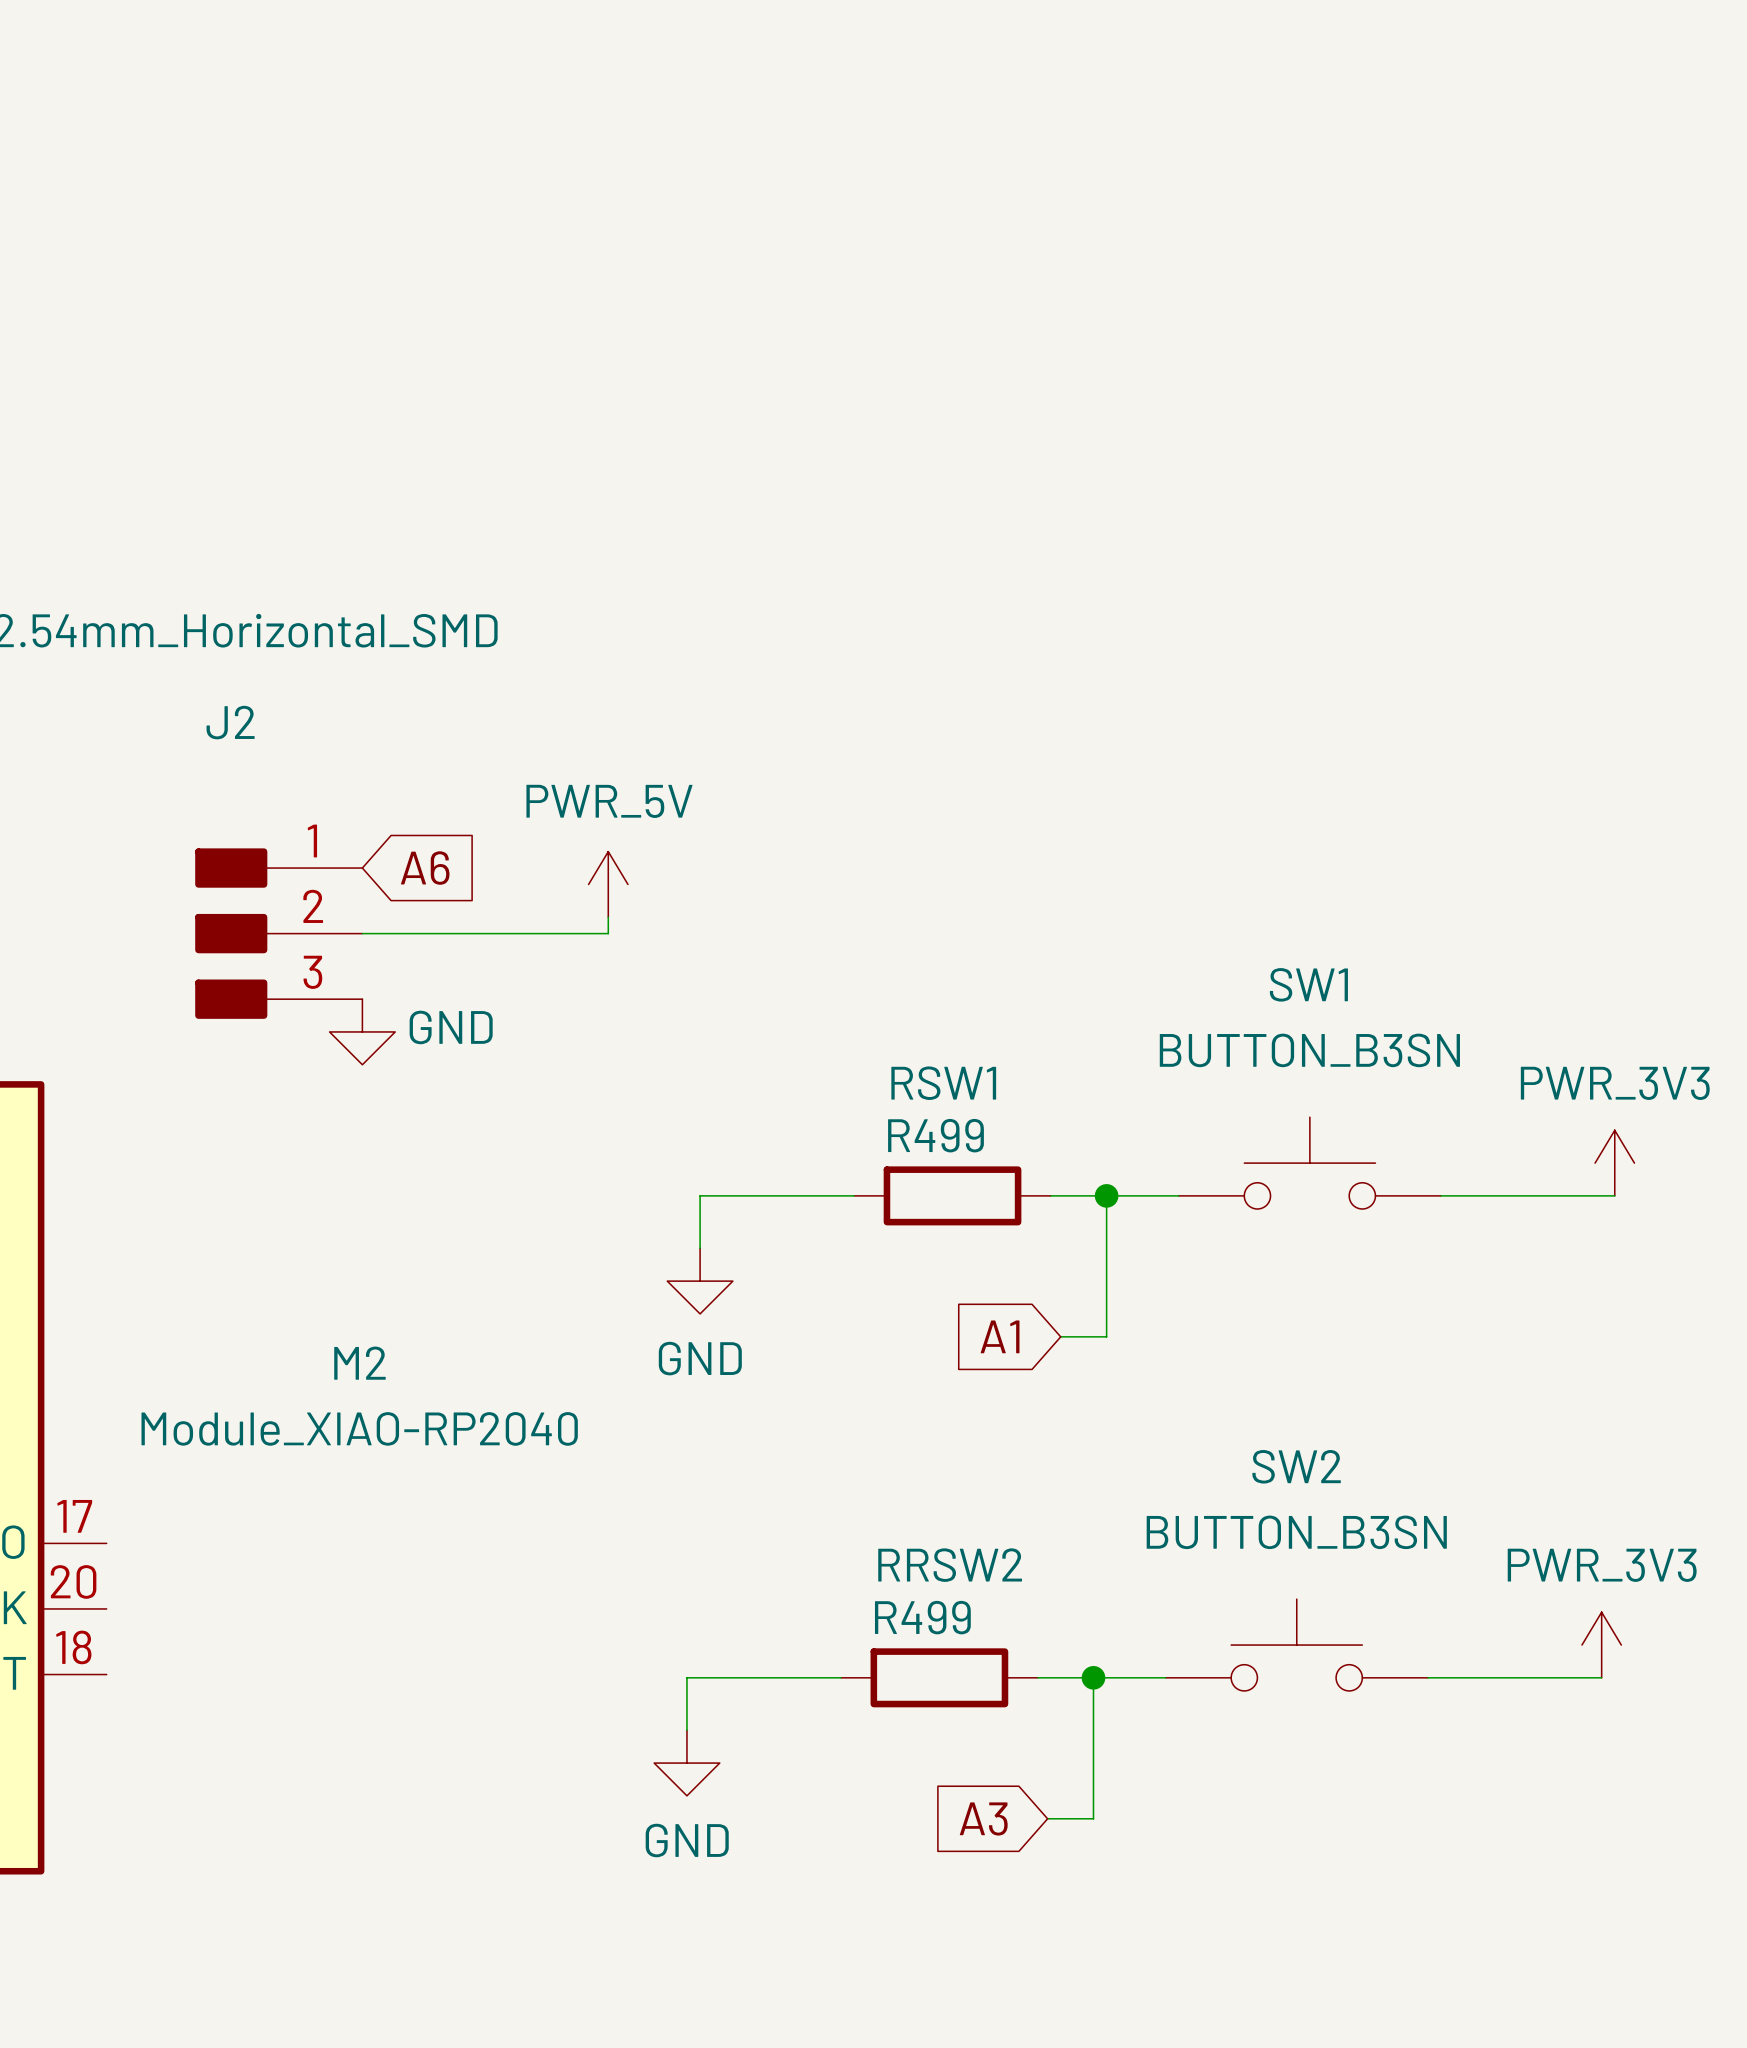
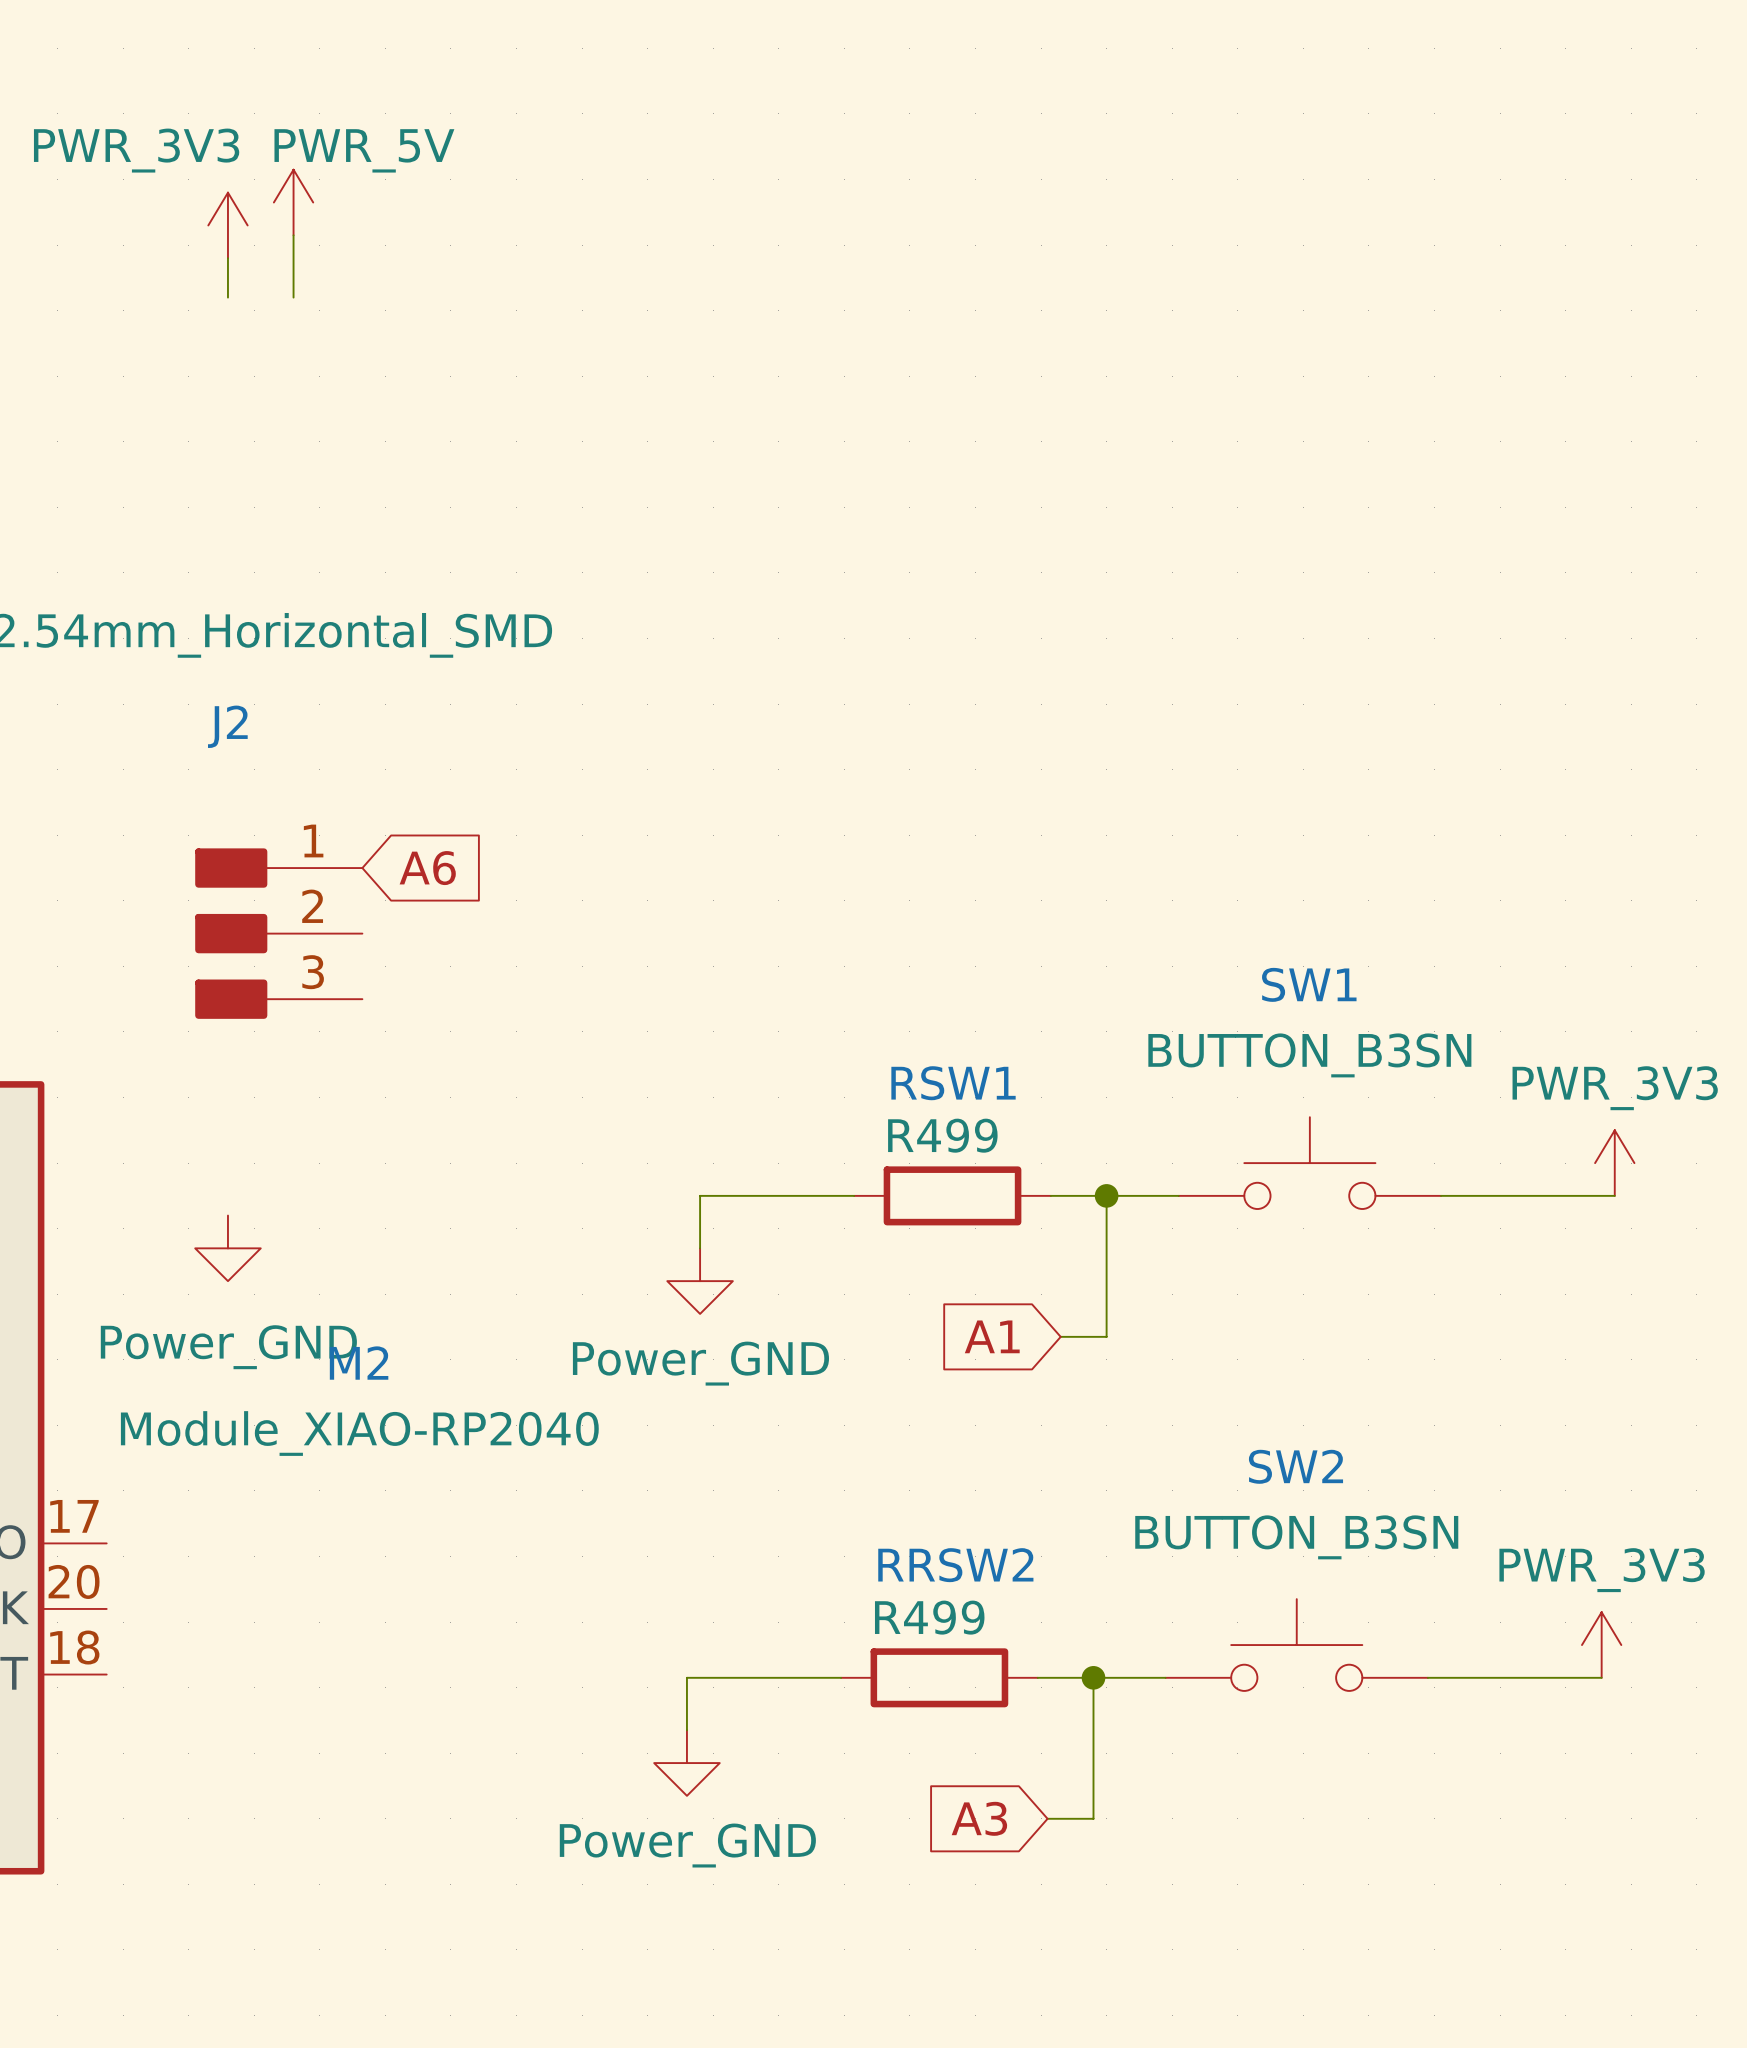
power symbol: none -> PWR_5V (293, 202)
power symbol: none -> PWR_3V3 (227, 225)
wire: none -> (293, 235) (293, 297)
wire: none -> (227, 258) (227, 297)
power symbol: PWR_5V (608, 884) -> none
wire: (608, 917) (608, 933) (362, 933) -> none
power symbol: GND (362, 1031) -> none
power symbol: none -> Power_GND (227, 1248)
power symbol: GND (700, 1281) -> Power_GND (700, 1281)
power symbol: GND (686, 1763) -> Power_GND (686, 1763)

